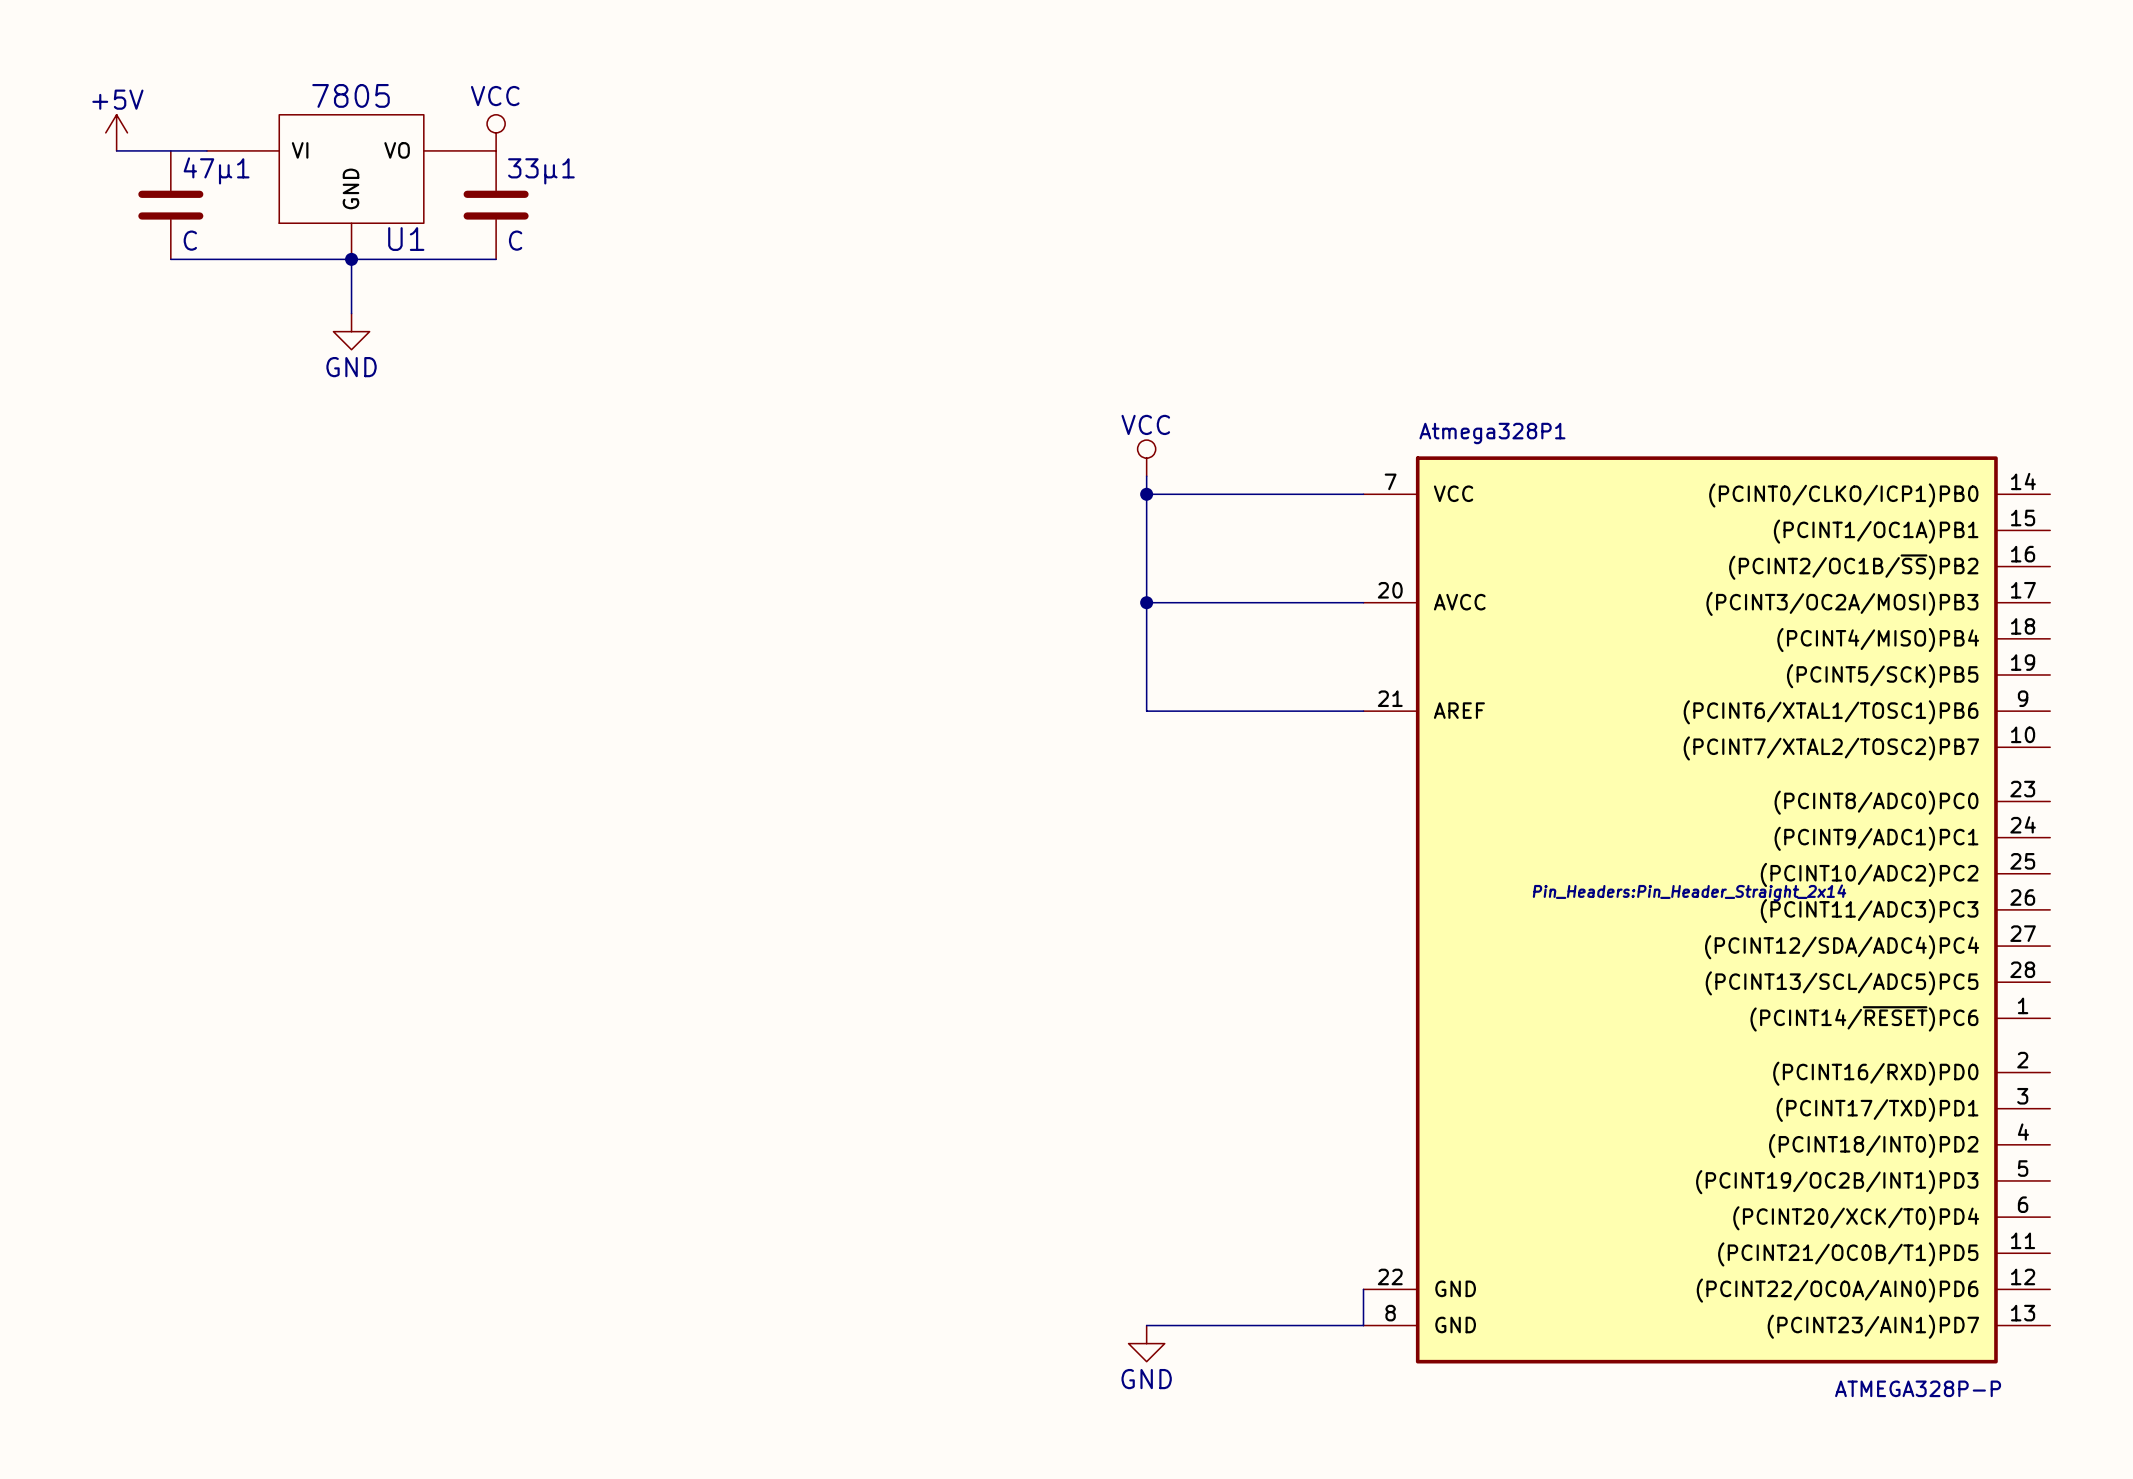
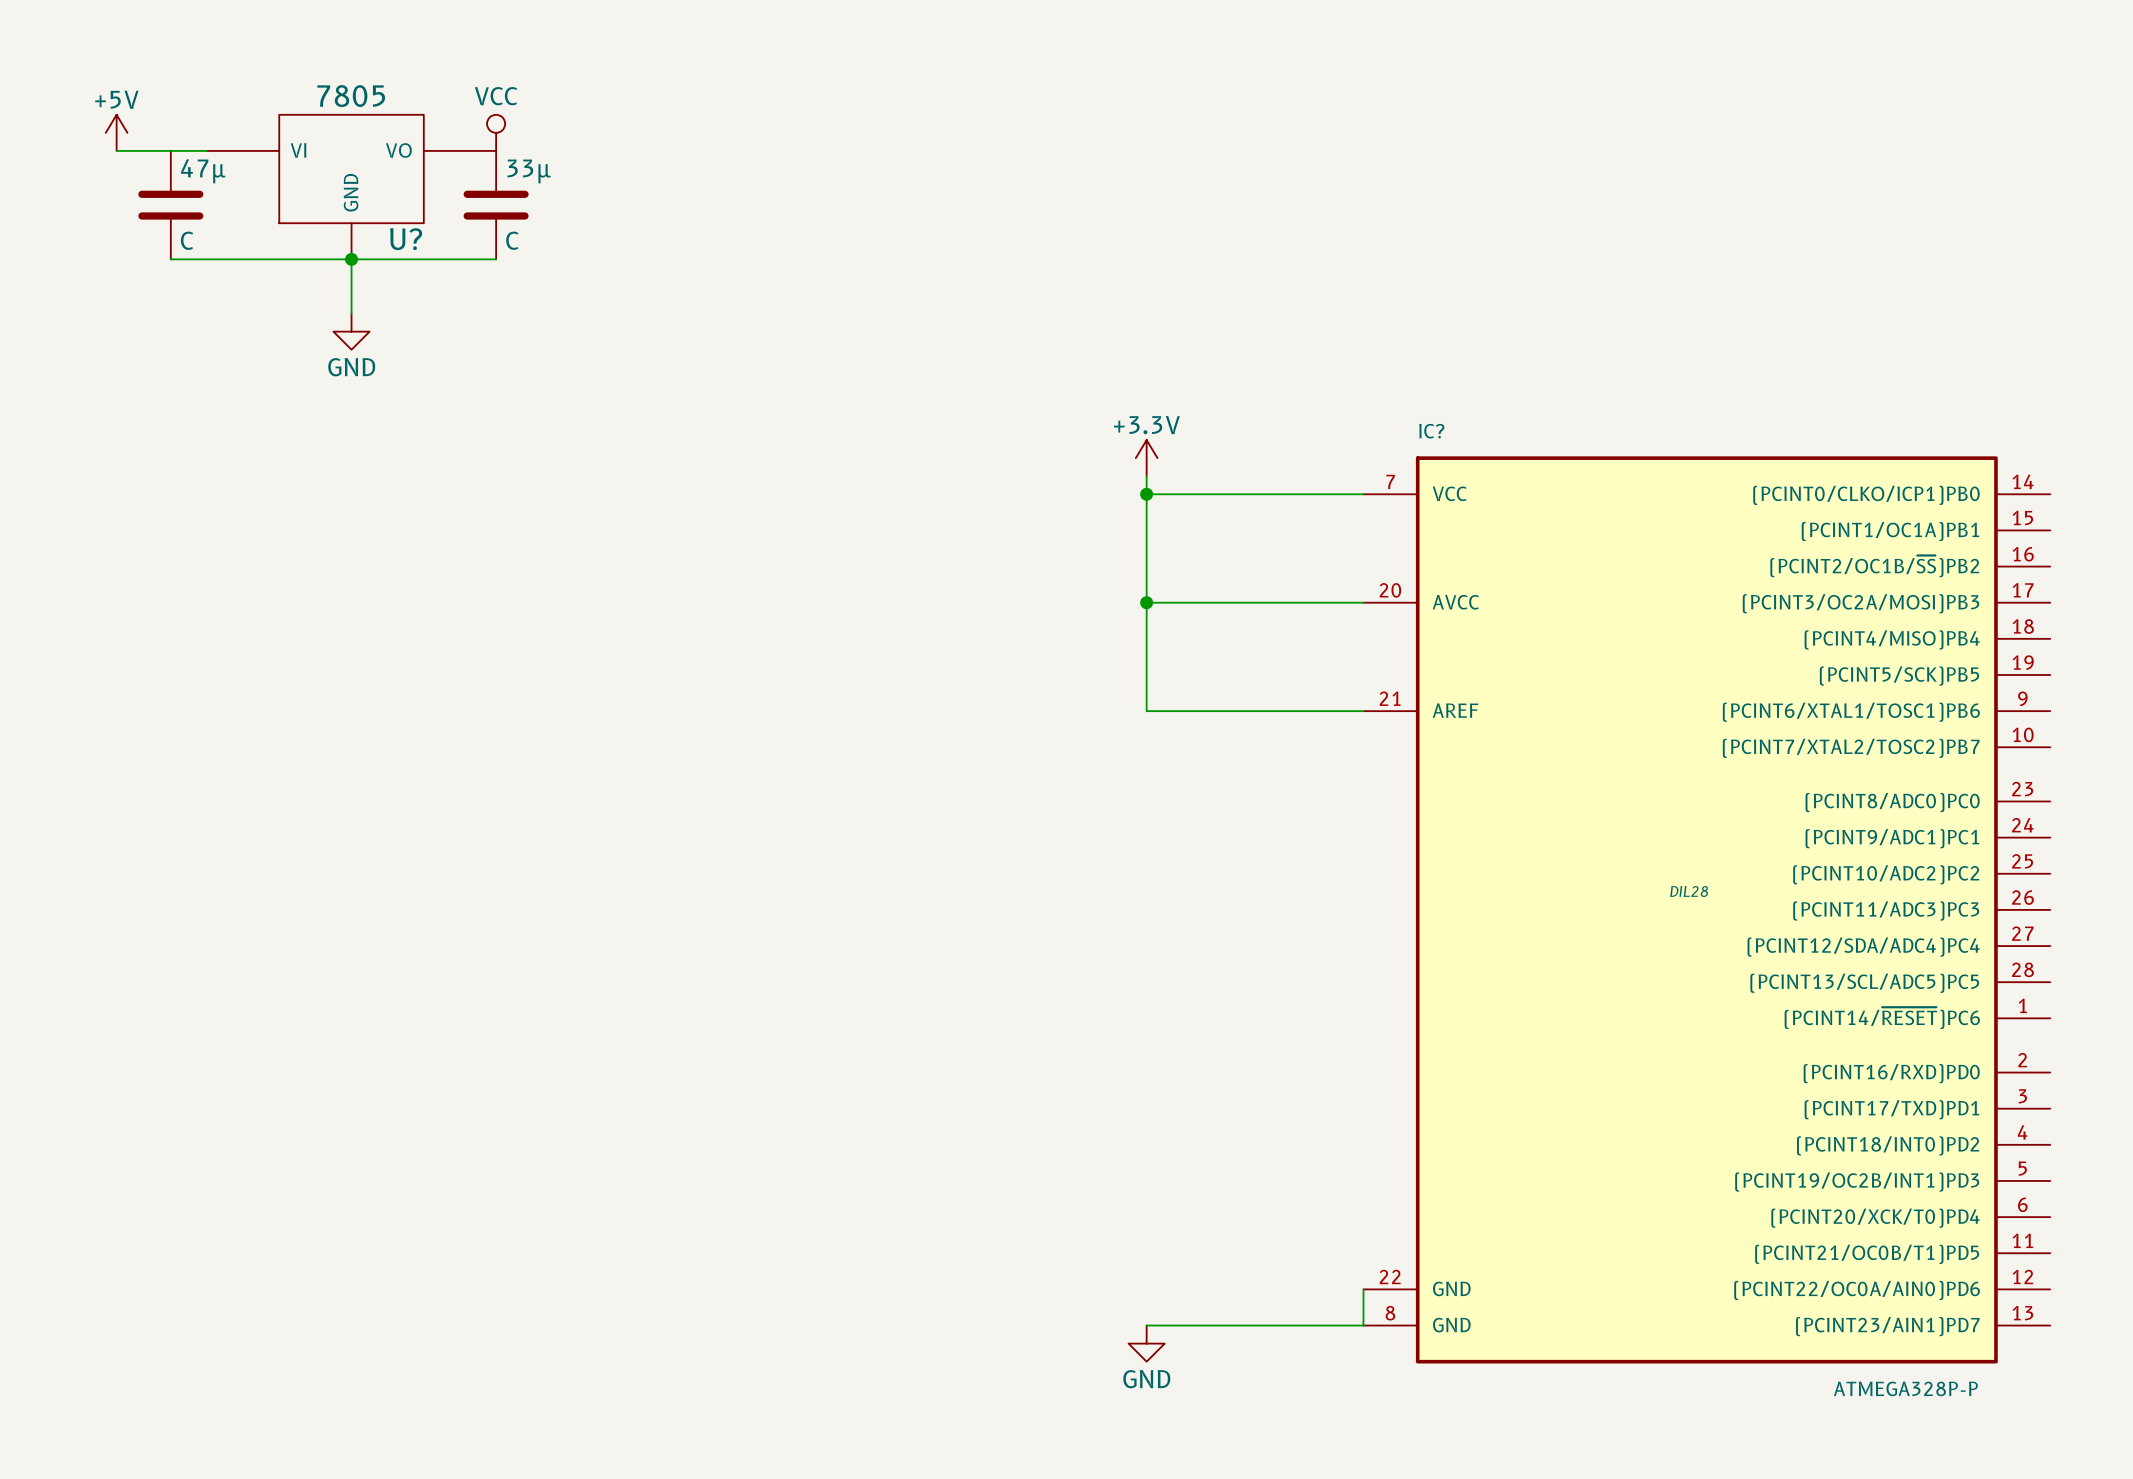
47µ1 name: 47µ1 (216, 170) -> 47µ (203, 171)
33µ1 name: 33µ1 (541, 171) -> 33µ (529, 171)
U1 name: U1 (406, 239) -> U? (406, 239)
Atmega328P1 name: Atmega328P1 (1492, 433) -> IC? (1431, 431)
power symbol: VCC (1146, 458) -> +3.3V (1146, 458)
Atmega328P1 text: Pin_Headers:Pin_Header_Straight_2x14 (1689, 892) -> DIL28 (1689, 891)

